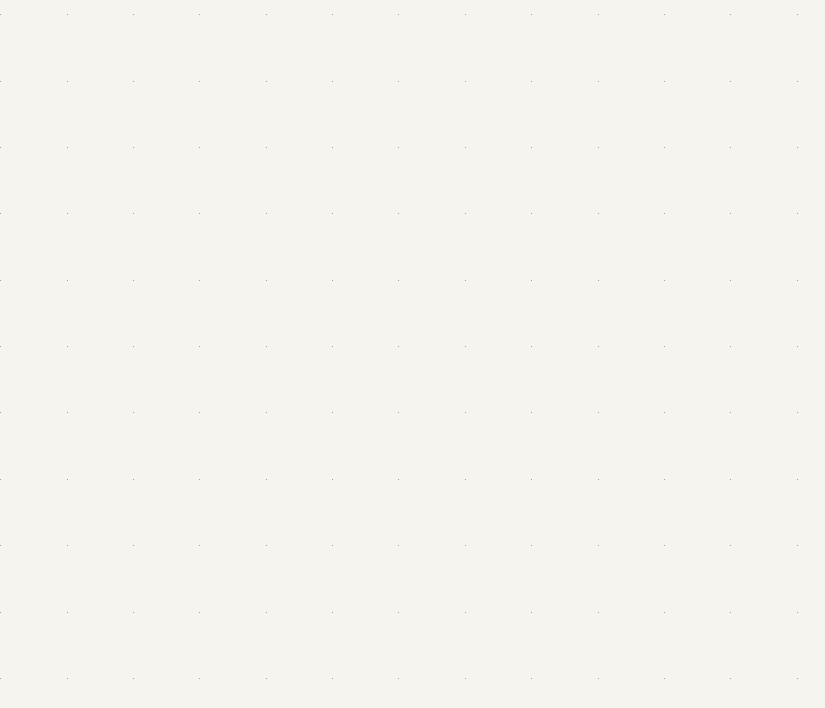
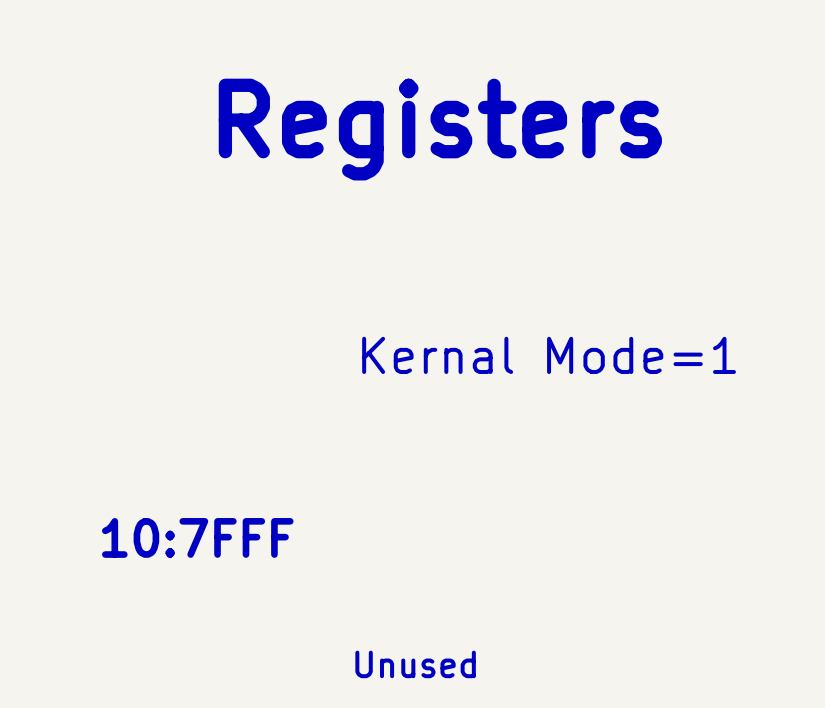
text: none -> Registers (440, 129)
text: none -> Kernal Mode=1 (549, 355)
text: none -> 10:7FFF (197, 537)
text: none -> Unused (415, 664)

